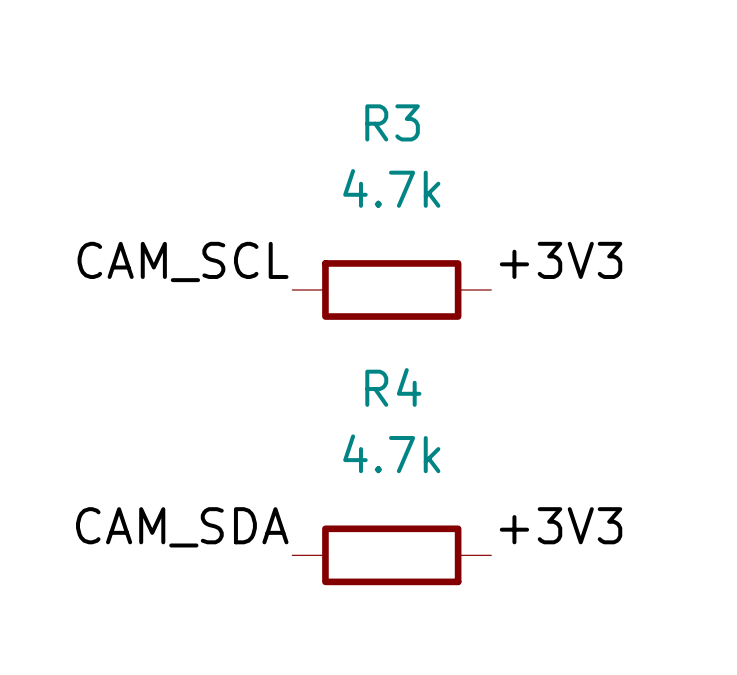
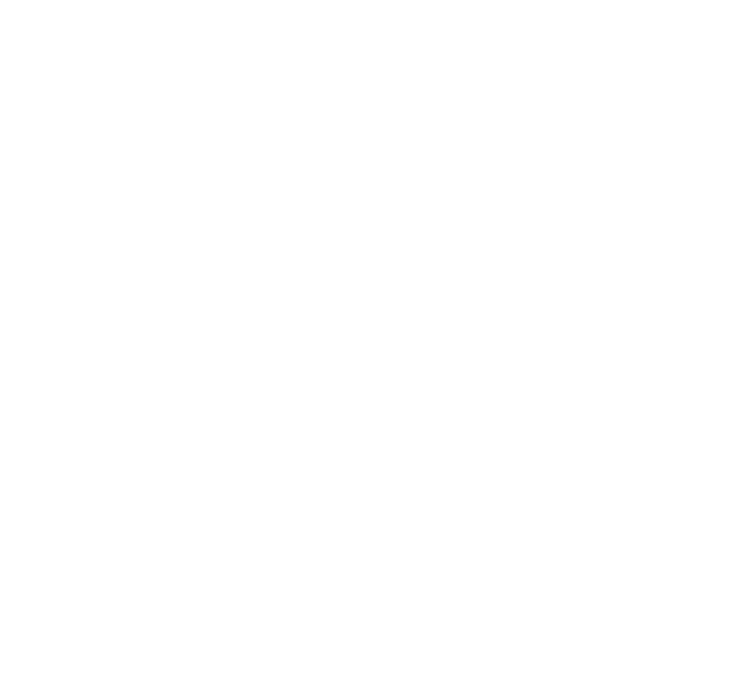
label: +3V3 (561, 260) -> none
label: CAM_SCL (183, 261) -> none
R3: 4.7k (391, 289) -> none
label: +3V3 (561, 525) -> none
label: CAM_SDA (182, 527) -> none
R4: 4.7k (391, 555) -> none

